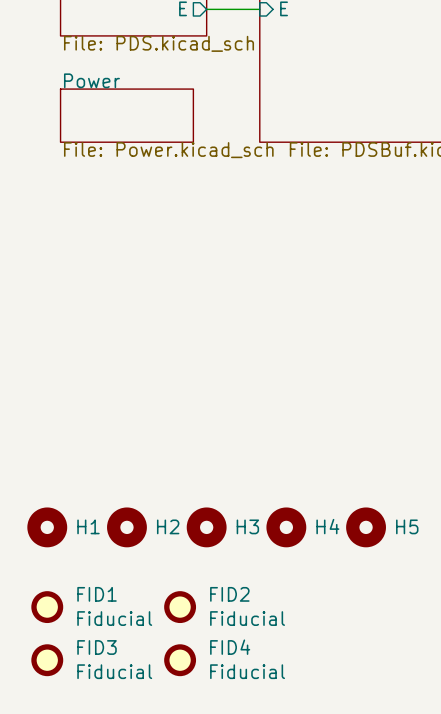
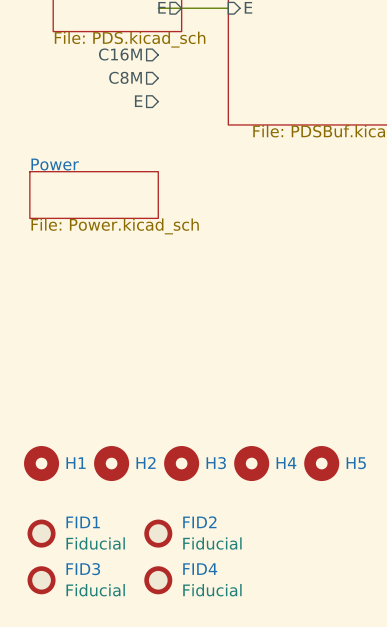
wire: none -> (158, 8) (181, 8)
sheet pin: none -> C16M (120, 54)
sheet pin: none -> C8M (125, 77)
sheet Power: File: Power.kicad_sch (126, 115) -> none
sheet pin: none -> E (138, 101)
sheet Power: none -> File: Power.kicad_sch (94, 195)

